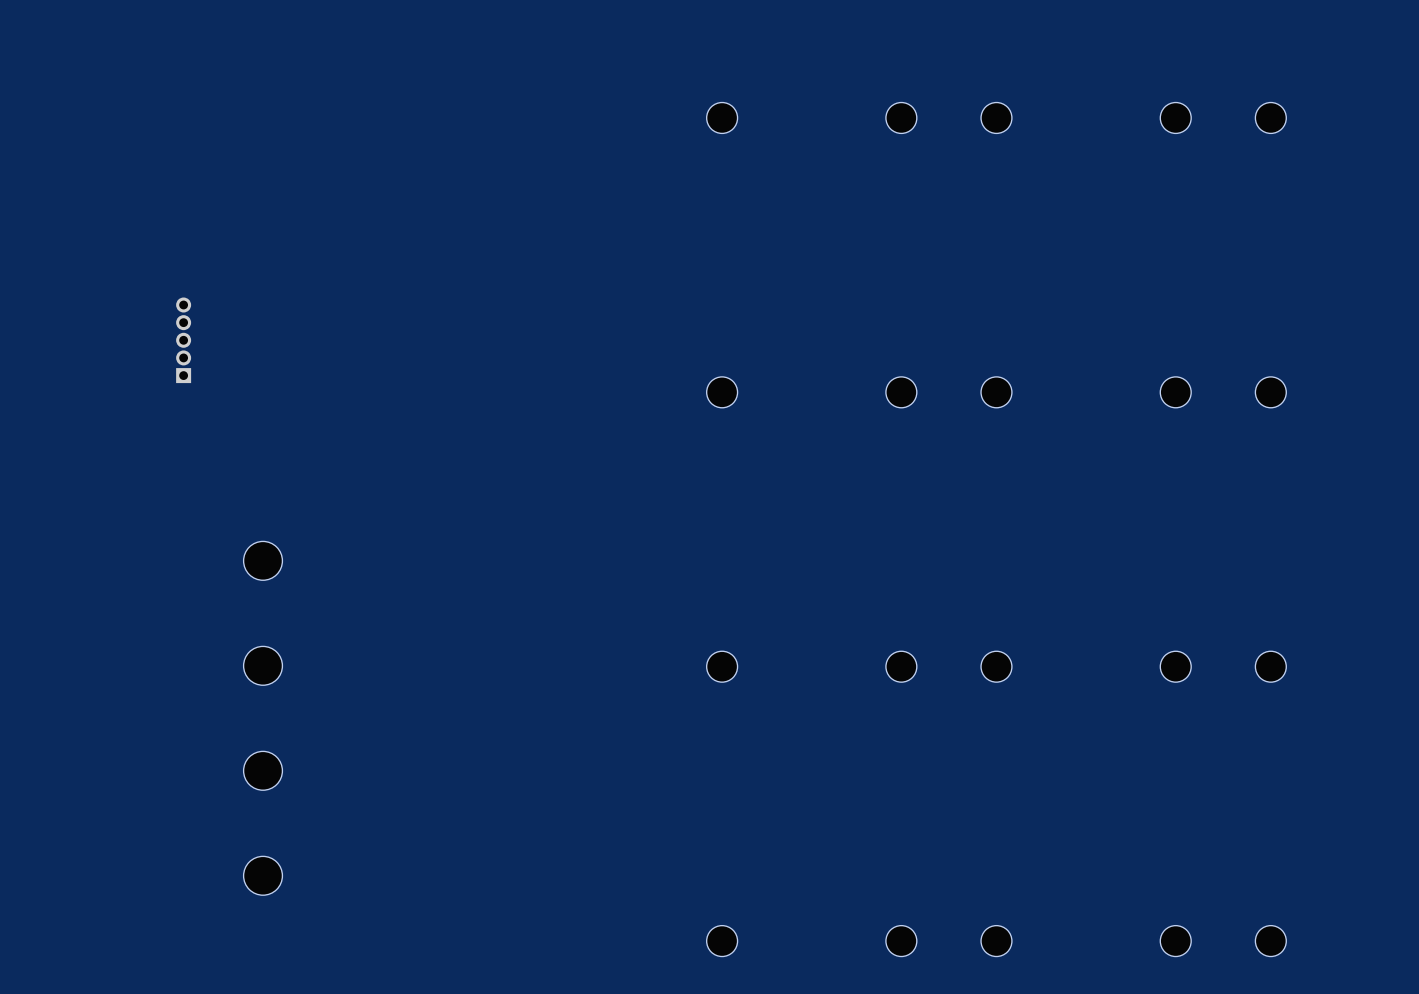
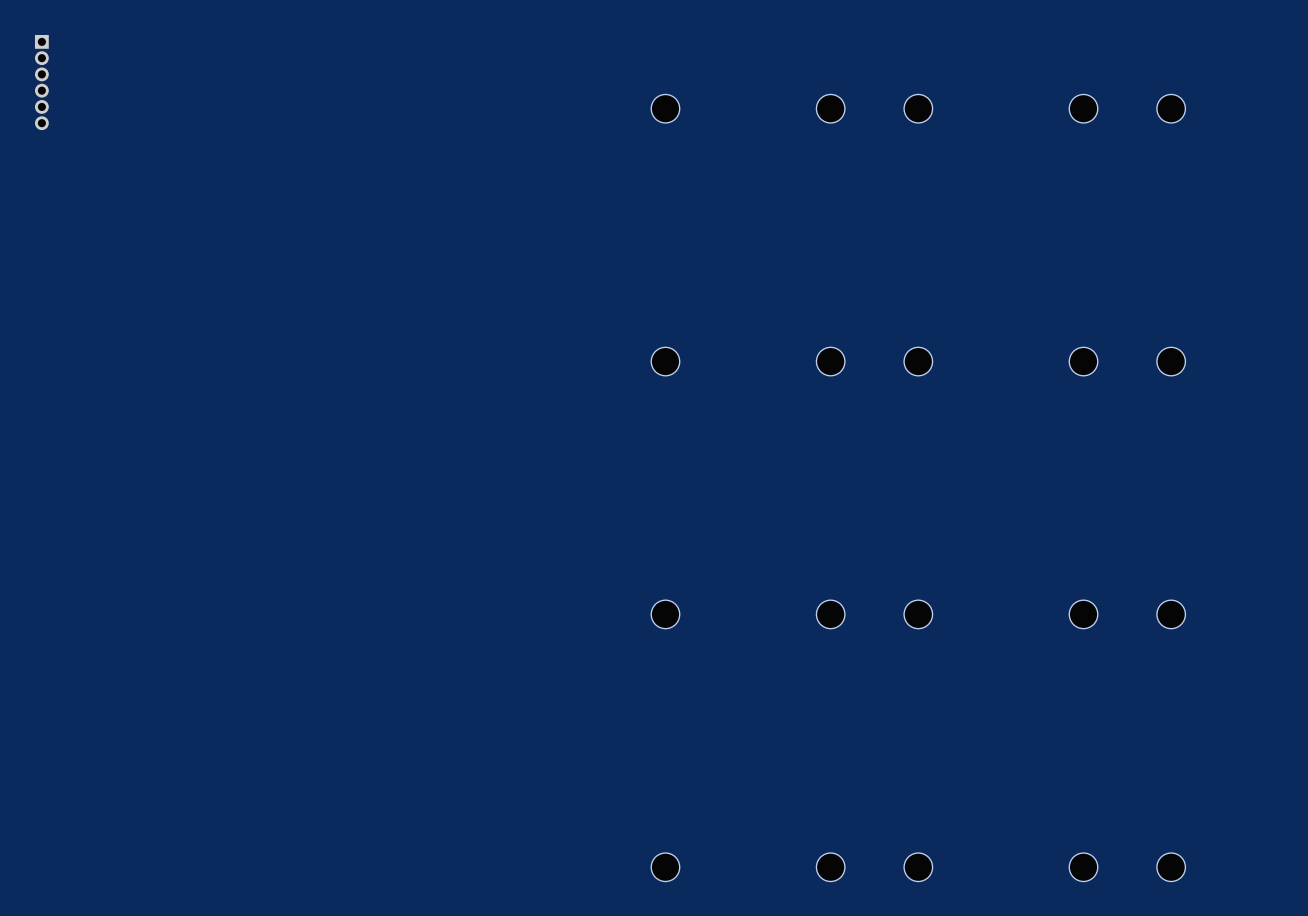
part: none -> (41, 82)
part: (183, 340) -> none
part: (263, 560) -> none
part: (263, 665) -> none
part: (263, 770) -> none
part: (263, 875) -> none

